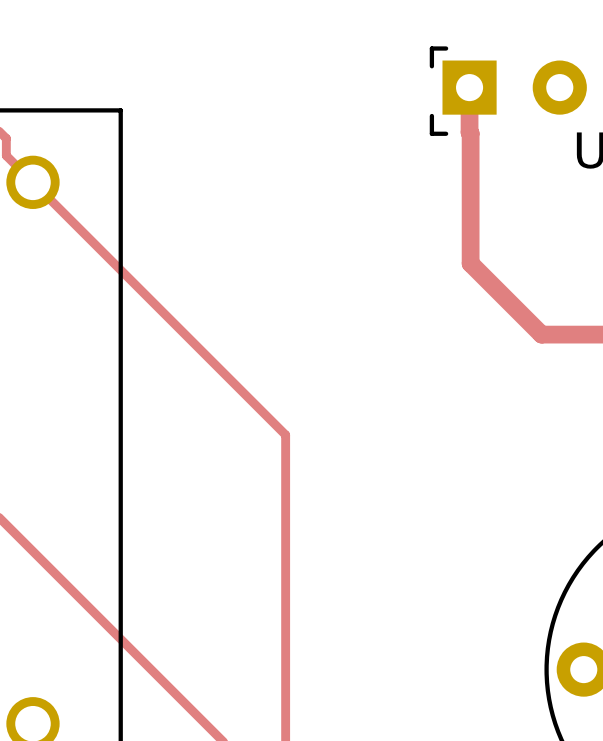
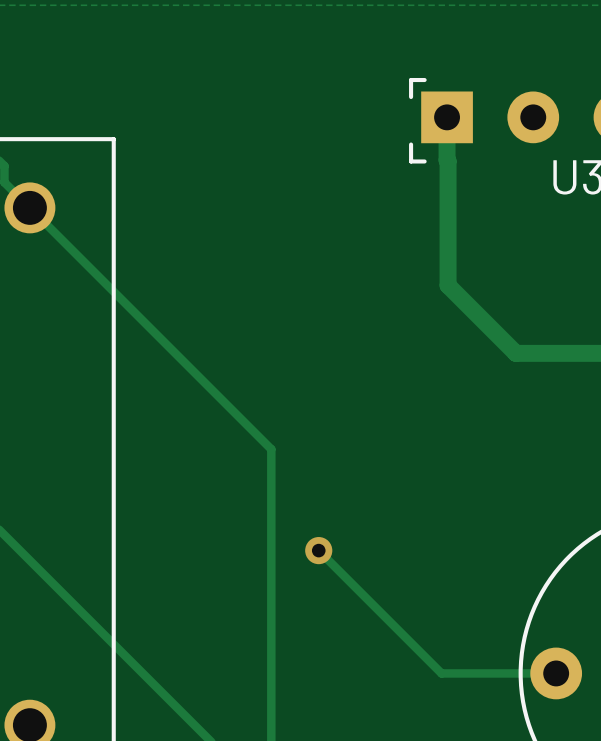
track: none -> (318, 550) (441, 673) (556, 673)
via: none -> (318, 550)

